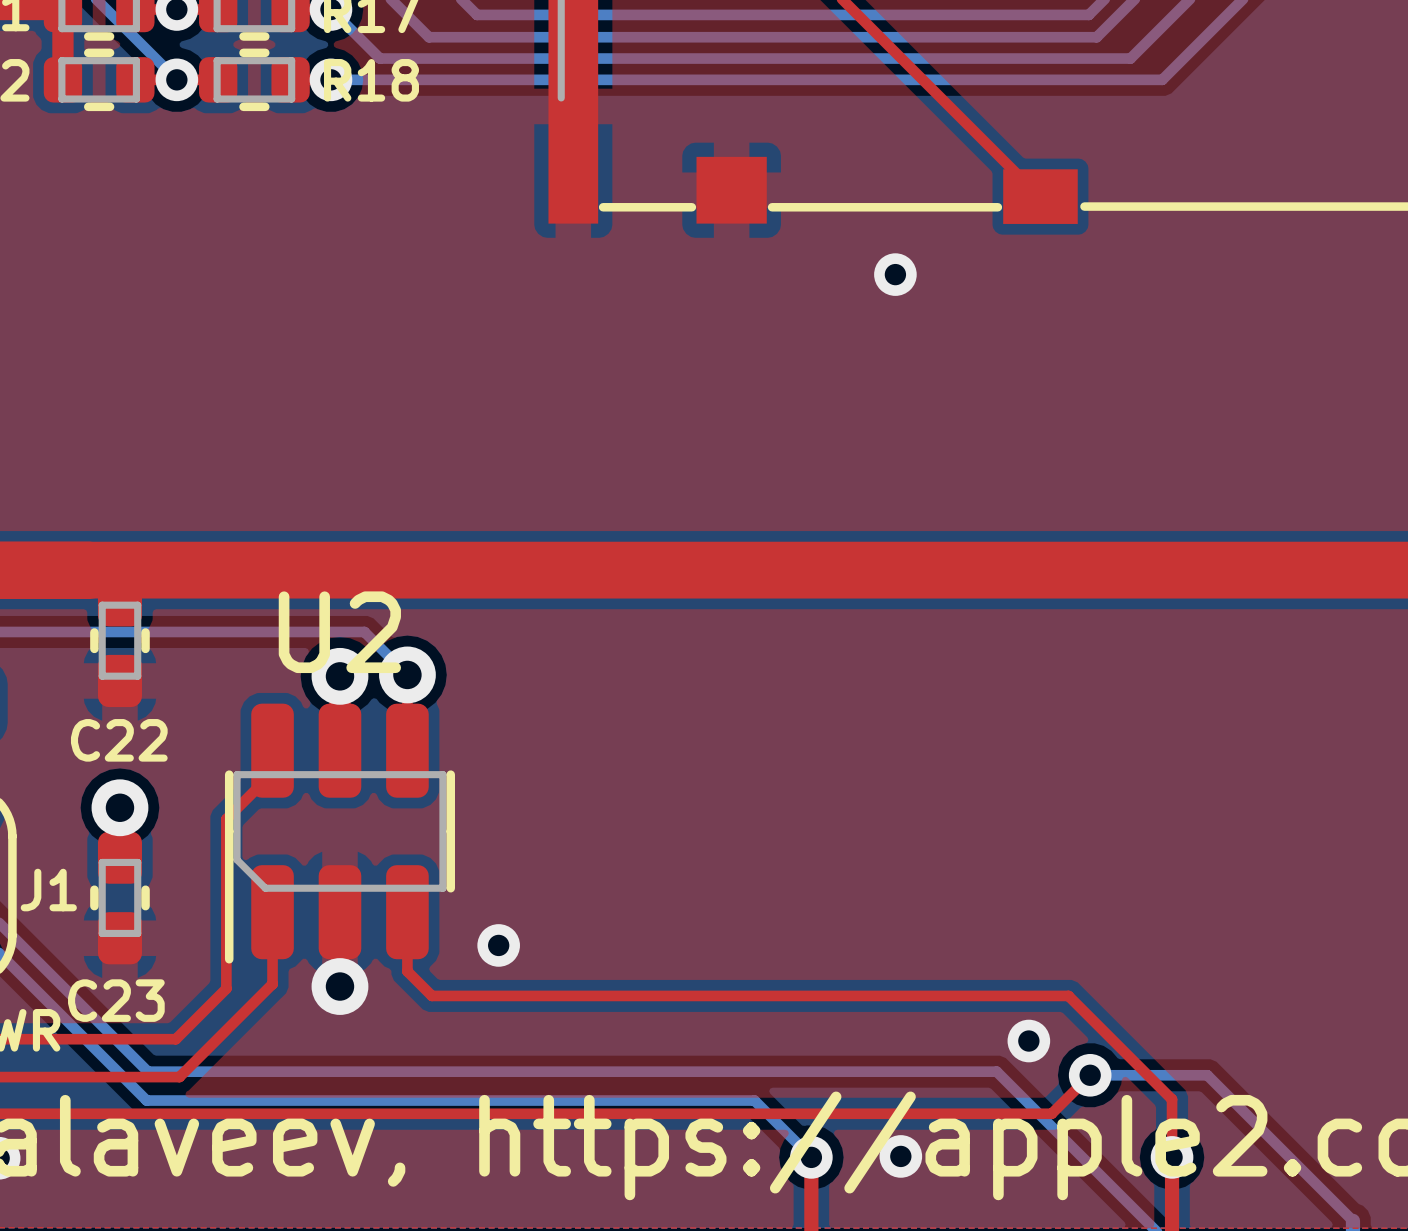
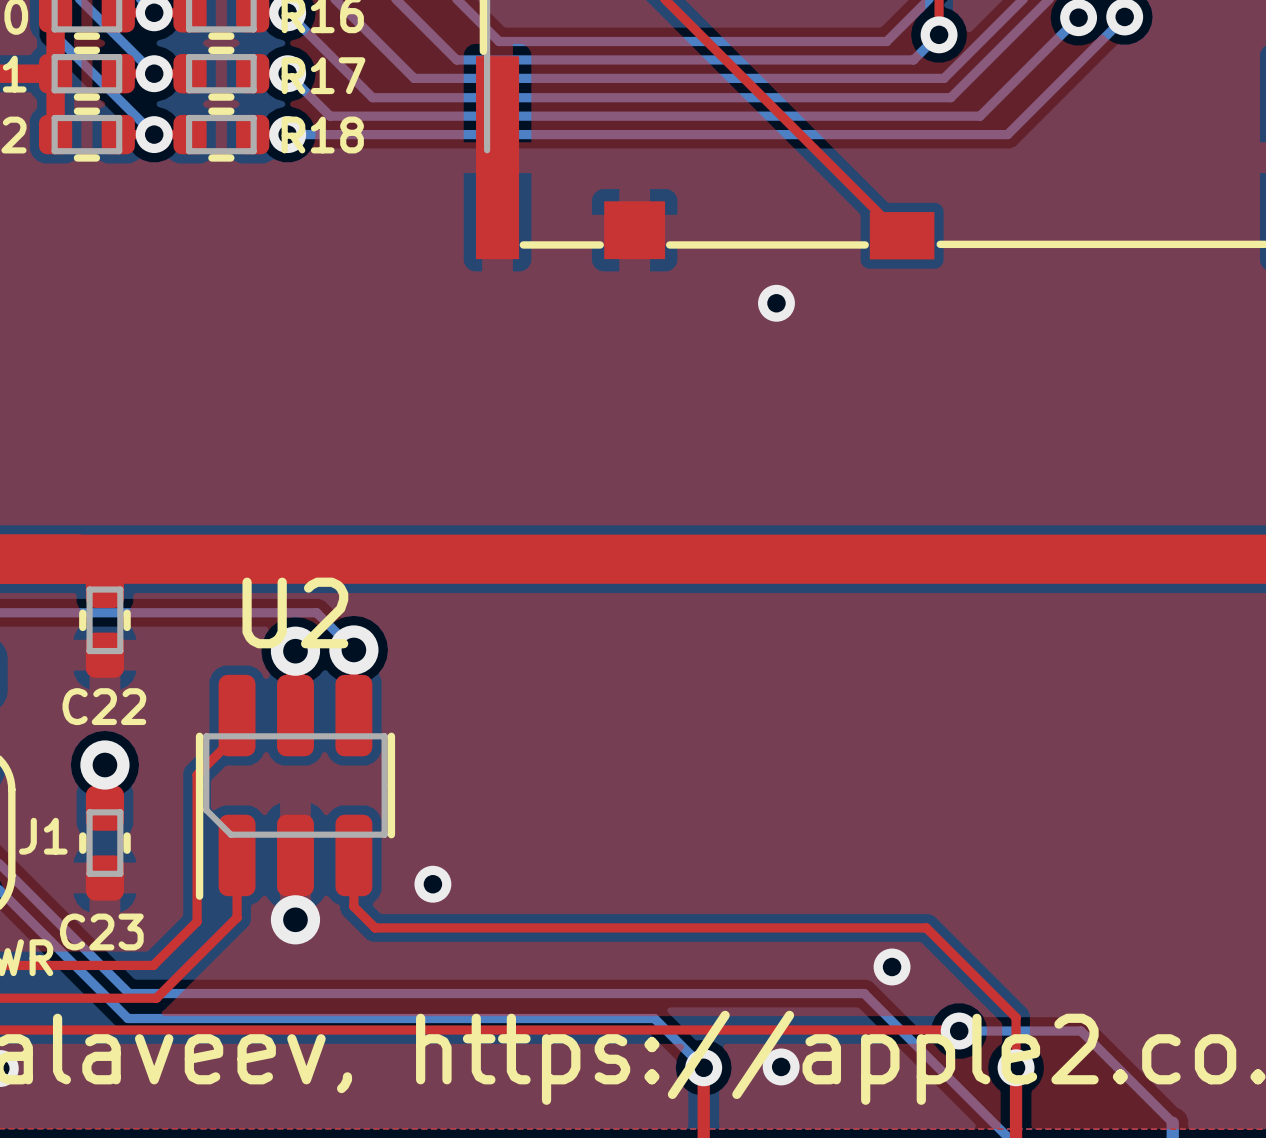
top track: (1090, 1075) (1051, 1113) -> (959, 1031) (911, 1029)
bottom track: (1090, 1075) (1207, 1075) (1247, 1114) -> (959, 1031) (1081, 1031)
via position: (1090, 1075) -> (959, 1031)

